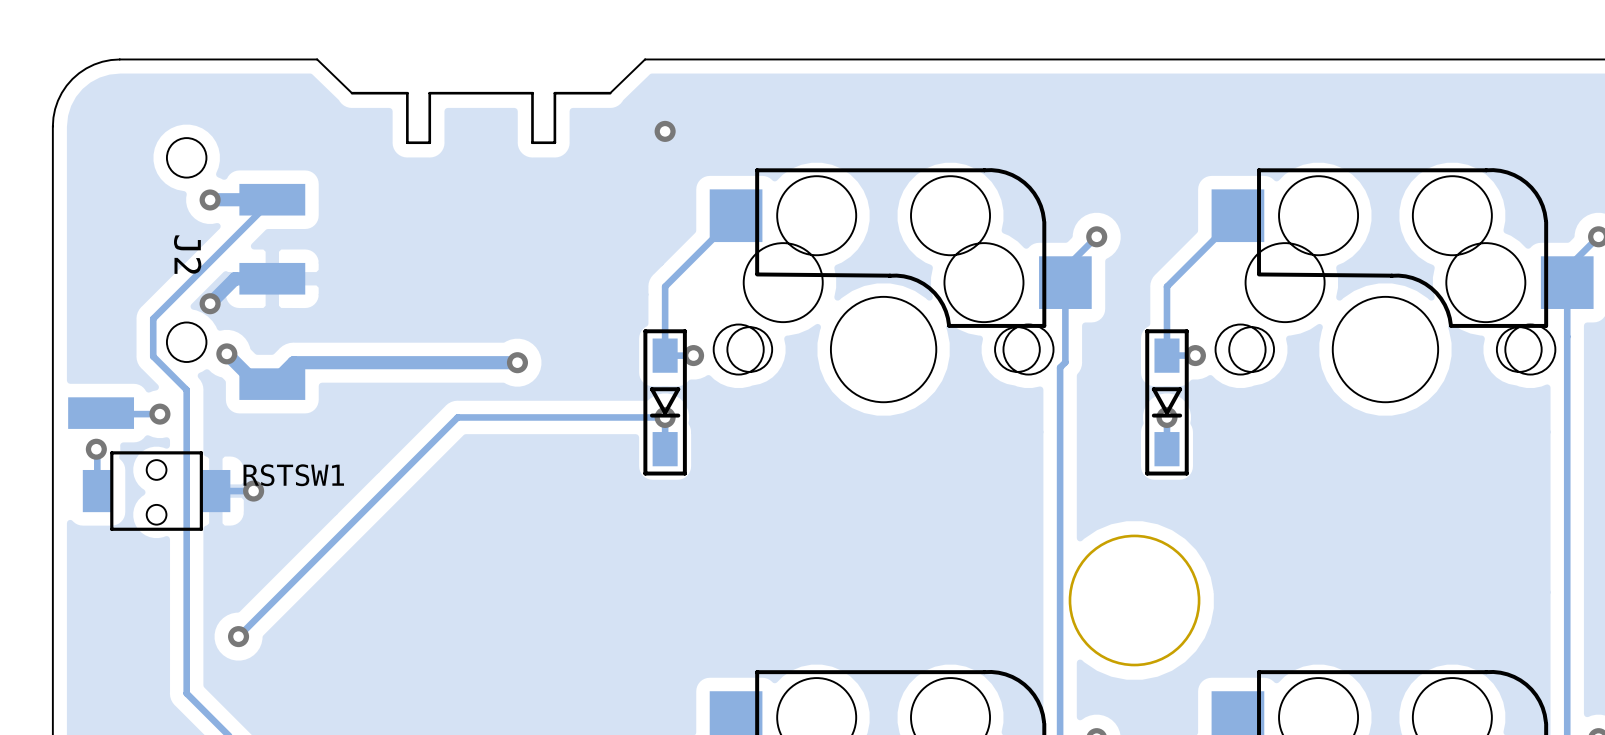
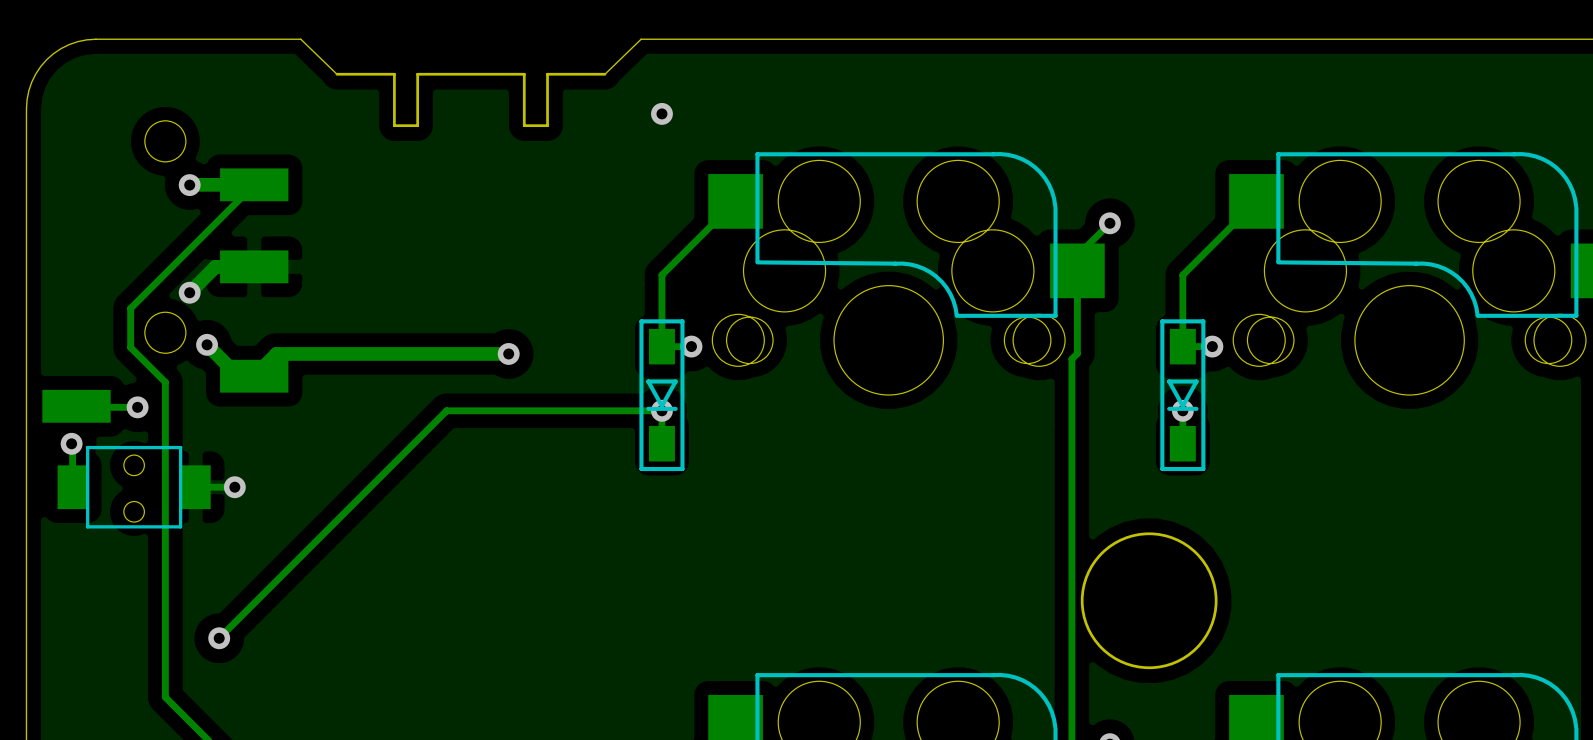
text: J2 (187, 254) -> none
text: RSTSW1 (293, 475) -> none

